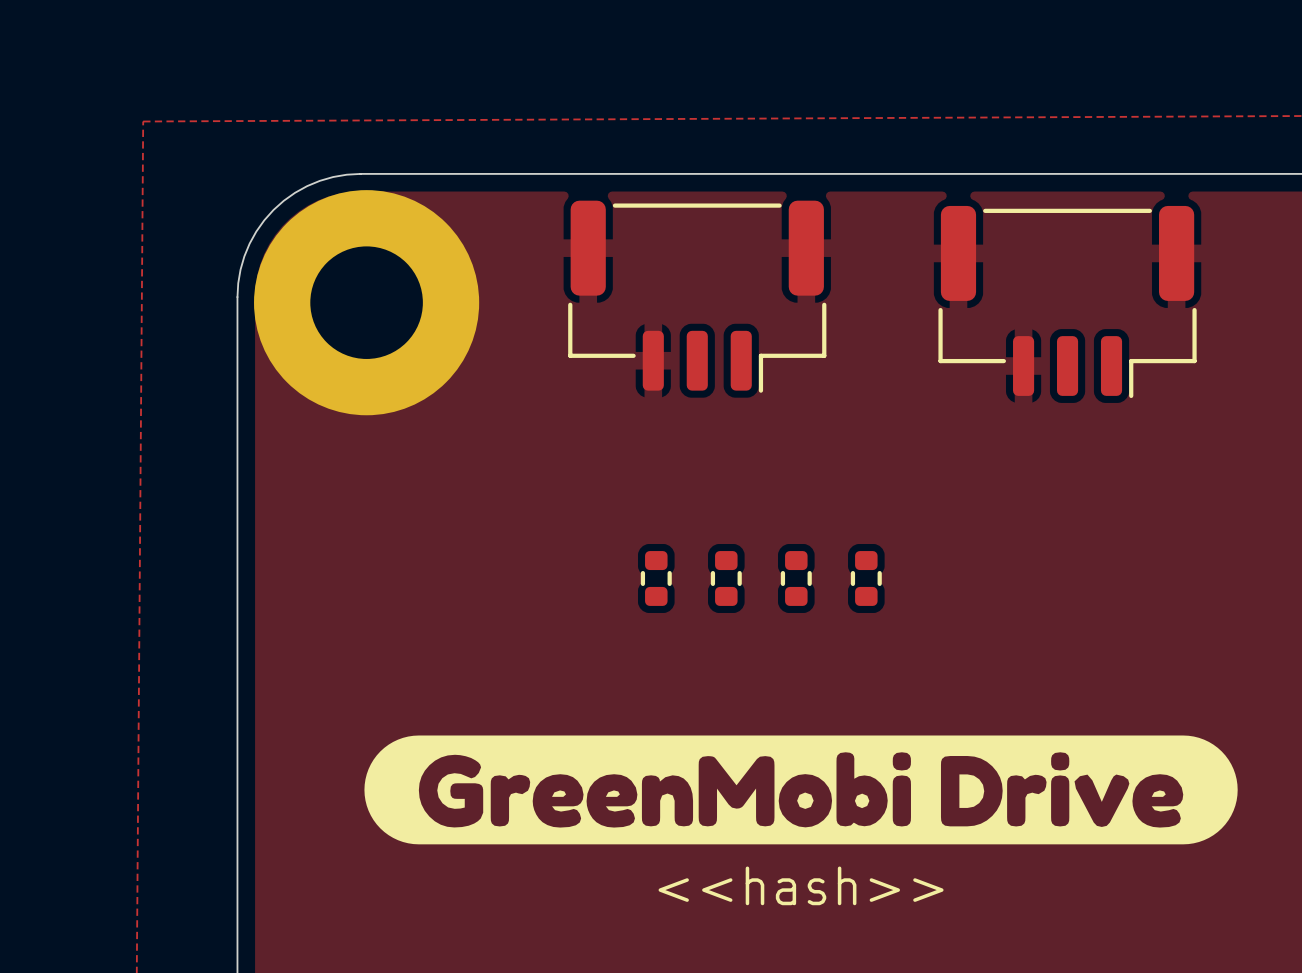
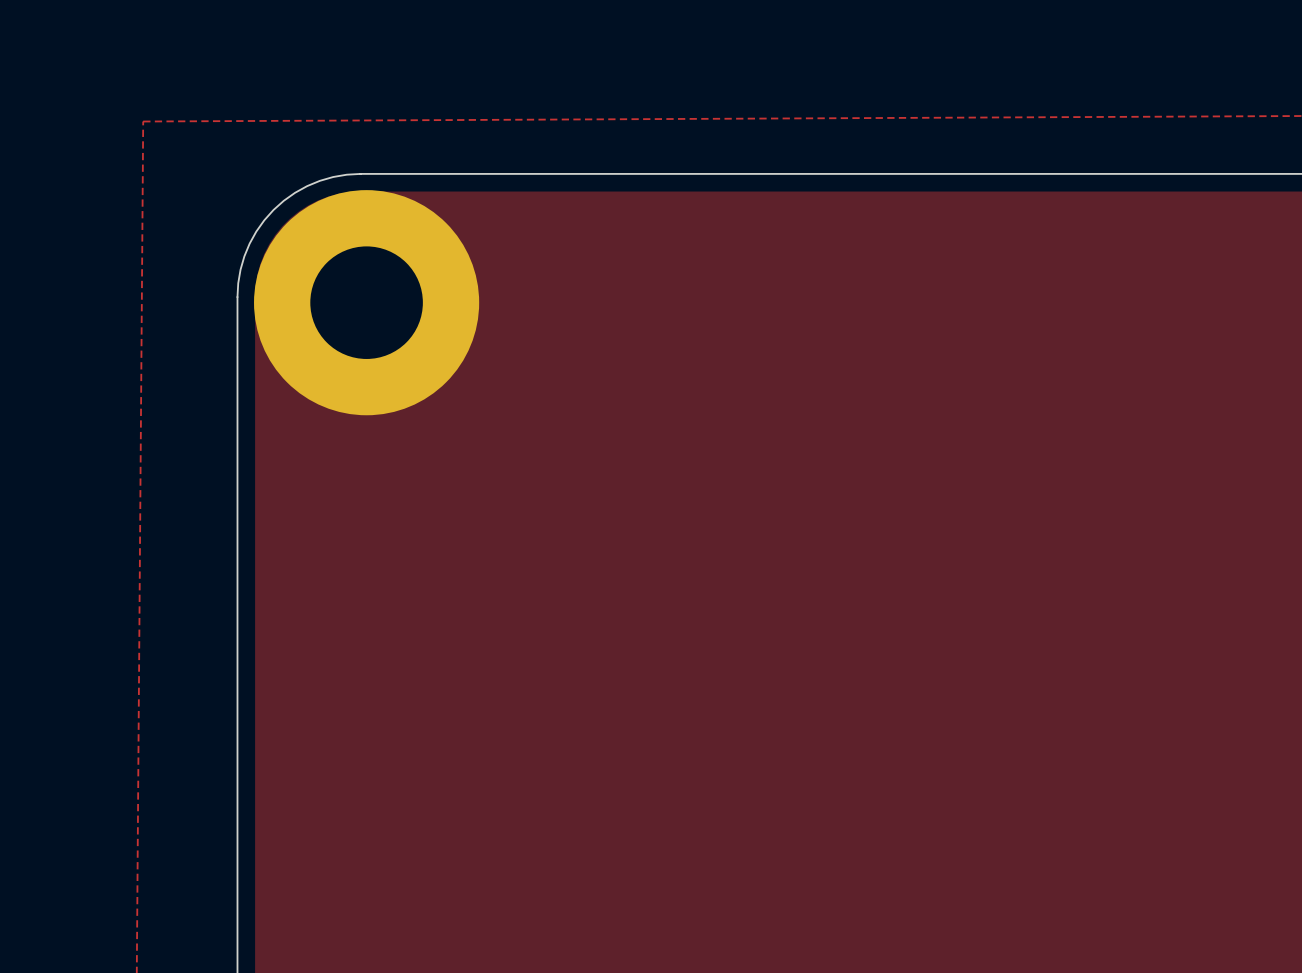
part: (697, 296) -> none
part: (1067, 301) -> none
part: (656, 578) -> none
part: (726, 578) -> none
part: (796, 578) -> none
part: (866, 578) -> none
drawing: [364, 735, 1238, 845] -> none
text: <<hash>> (801, 885) -> none

